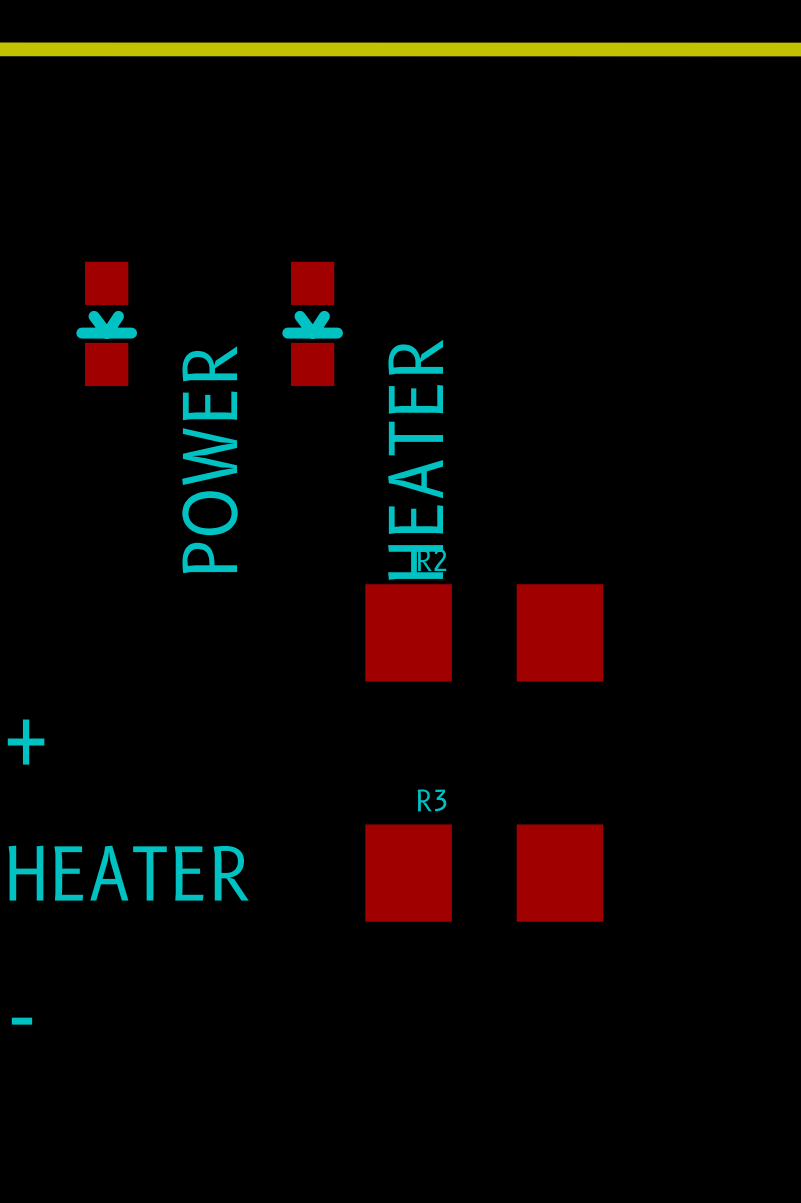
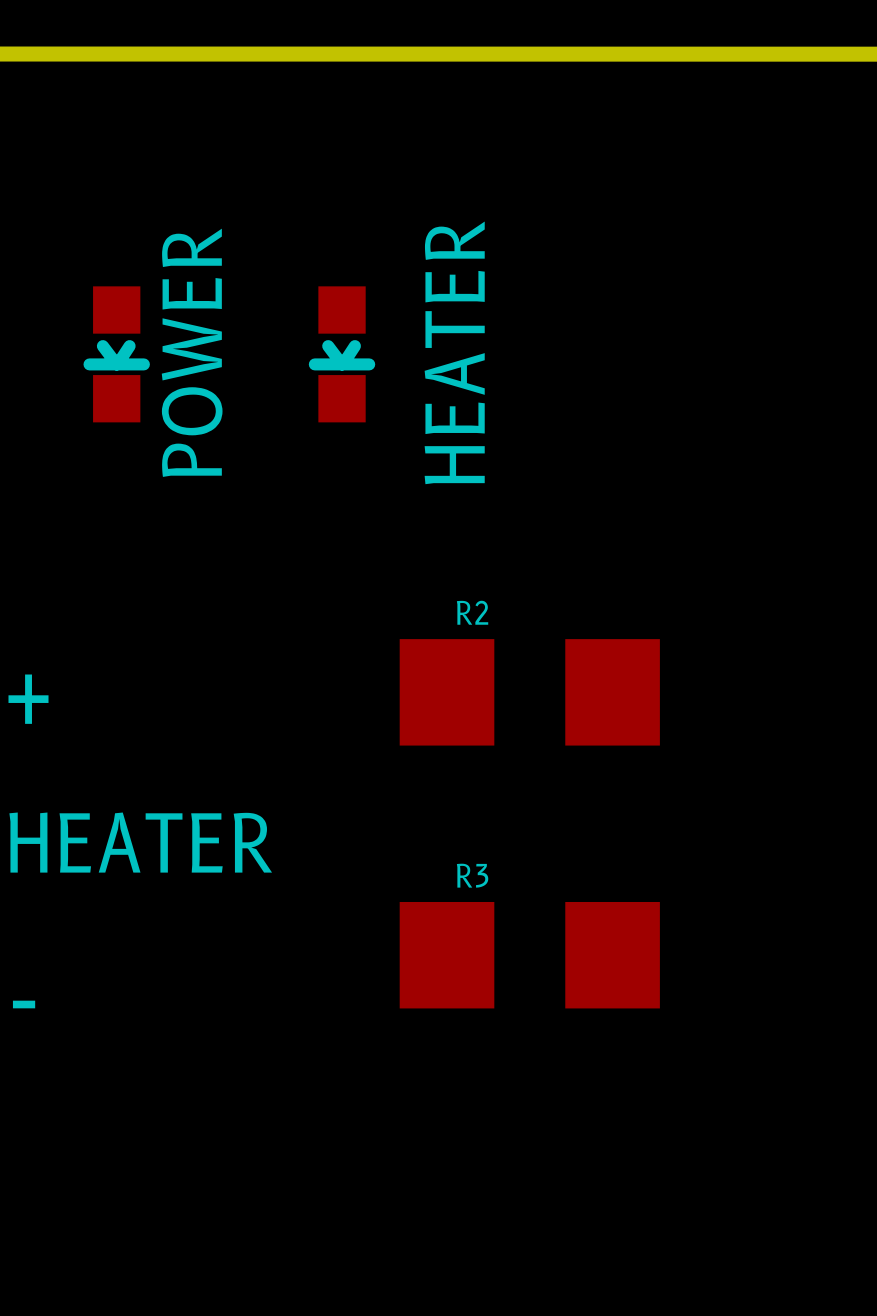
text position: POWER (209, 459) -> POWER (192, 352)
text position: HEATER (415, 459) -> HEATER (454, 352)
text position: + (26, 742) -> + (28, 699)
text position: HEATER (128, 873) -> HEATER (140, 842)
text position: - (21, 1021) -> - (24, 1004)

